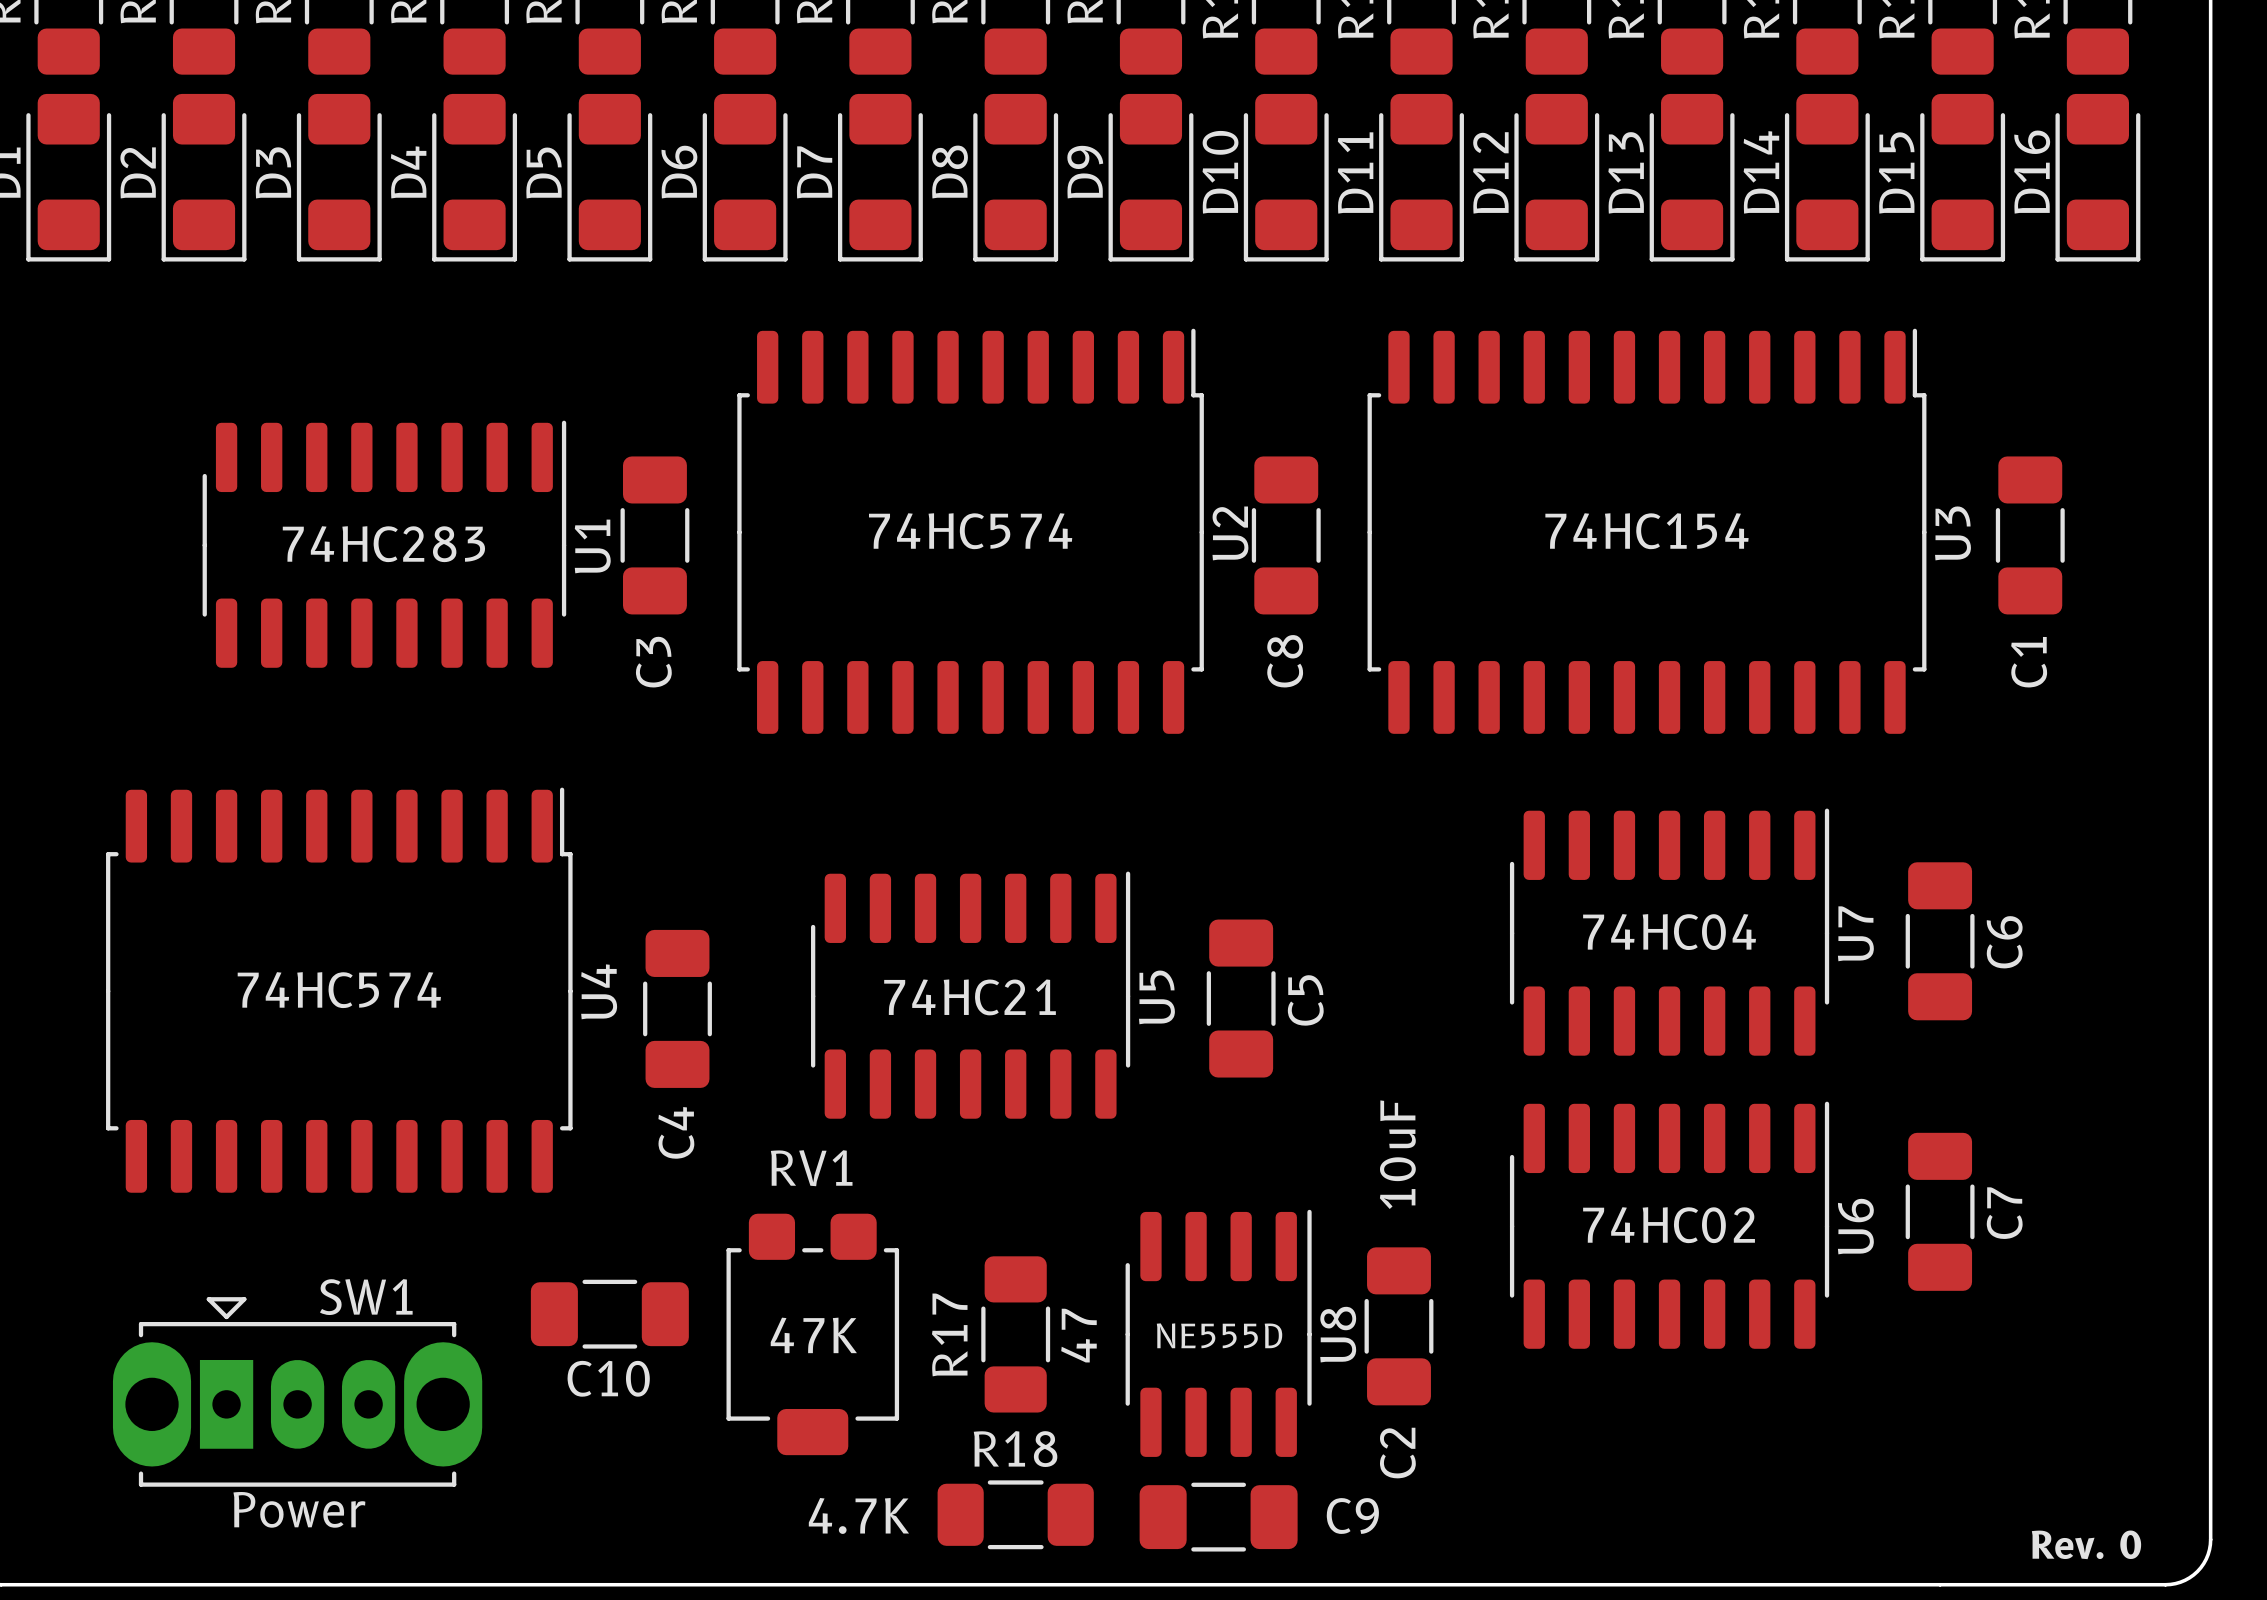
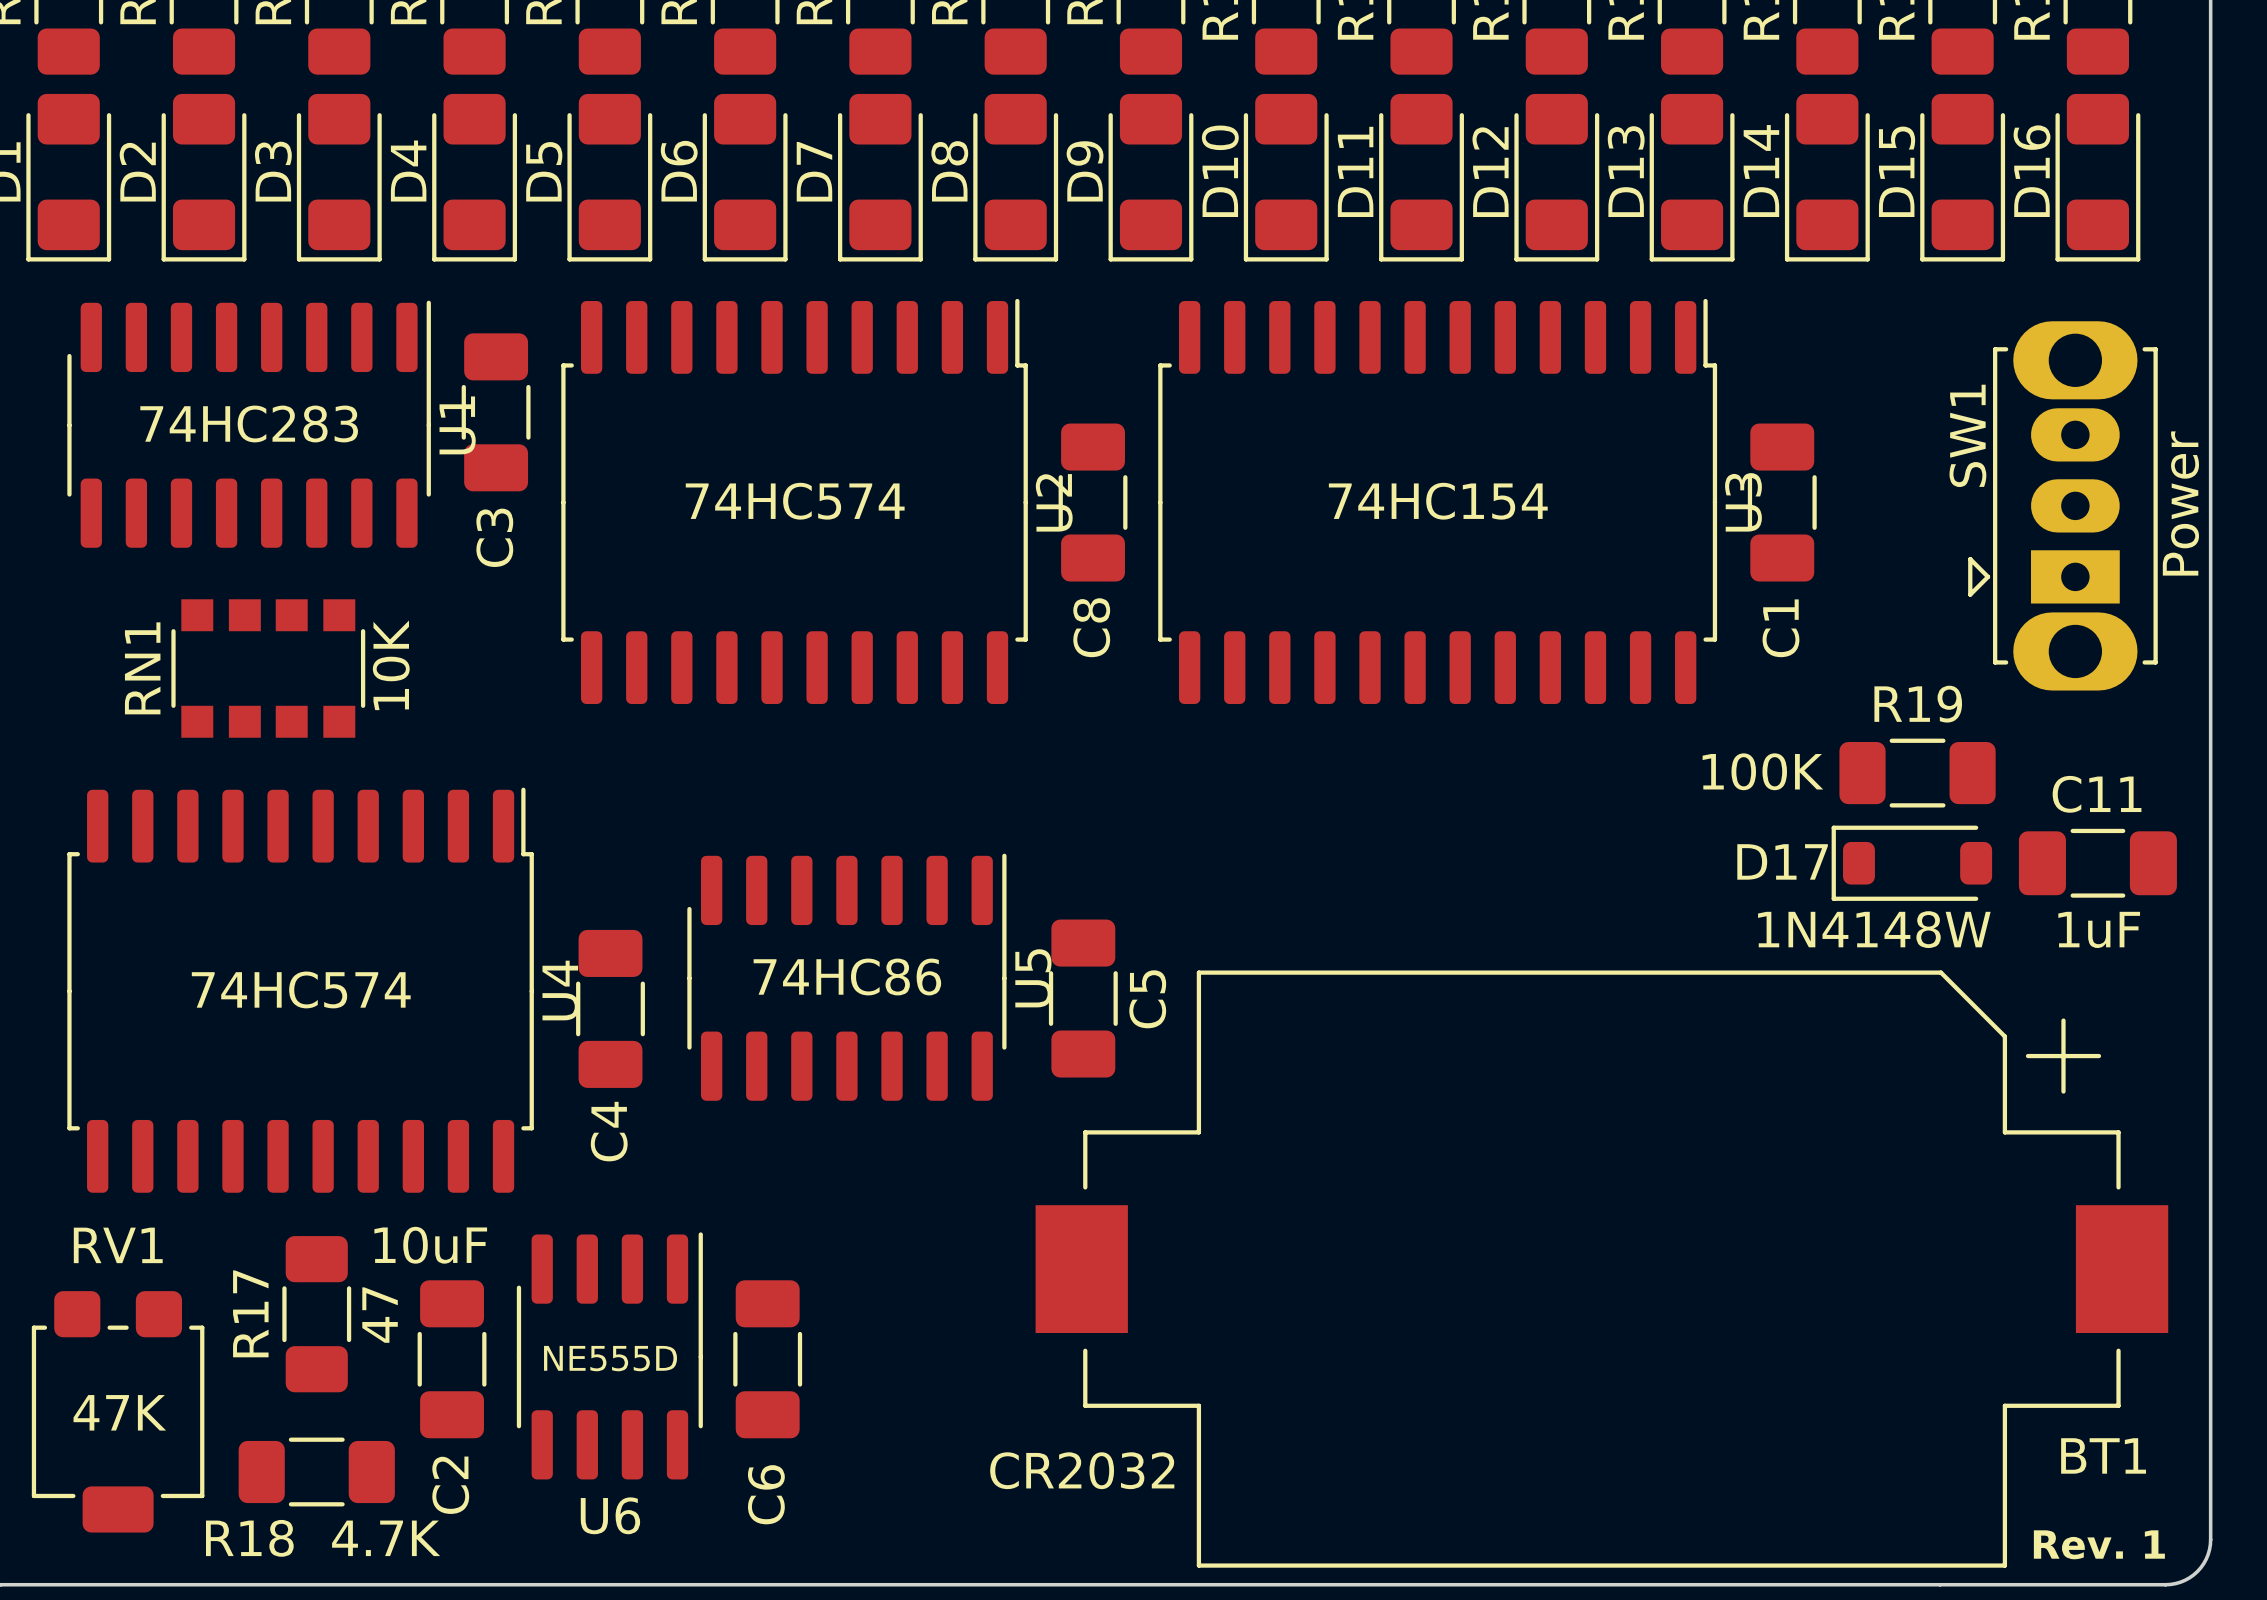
U2 position: (970, 531) -> (794, 501)
U3 position: (1647, 531) -> (1437, 501)
C3 position: (654, 535) -> (496, 412)
C8 position: (1286, 535) -> (1093, 502)
C1 position: (2030, 535) -> (1782, 502)
U1 position: (384, 544) -> (249, 424)
RN1: none -> 10K (268, 668)
R19: none -> 100K (1917, 773)
D17: none -> 1N4148W (1911, 863)
C11: none -> 1uF (2097, 863)
U7: 74HC04 (1669, 932) -> none
C6 position: (1940, 941) -> (767, 1359)
C6 name position: C6 (2004, 942) -> C6 (766, 1494)
U4 position: (339, 990) -> (300, 990)
U5 position: (970, 995) -> (846, 977)
U5 value: 74HC21 (970, 997) -> 74HC86 (847, 976)
C5 position: (1241, 998) -> (1083, 998)
C4 position: (677, 1008) -> (610, 1008)
U6 footprint: [1509, 1101, 1830, 1349] -> [516, 1232, 703, 1480]
C2 value rotation: 0° (1397, 1154) -> 90° clockwise (430, 1245)
C7: (1940, 1211) -> none
U6 value: 74HC02 (1669, 1225) -> NE555D (610, 1358)
U6 name position: U6 (1855, 1226) -> U6 (610, 1515)
BT1: none -> CR2032 (1601, 1269)
C10: (609, 1314) -> none
C2 position: (1398, 1326) -> (452, 1359)
U8: NE555D (1218, 1333) -> none
RV1 position: (812, 1334) -> (118, 1411)
R17 position: (1015, 1334) -> (316, 1314)
SW1 rotation: 0° (297, 1391) -> 90° counterclockwise (2062, 505)
SW1 position: (297, 1391) -> (2062, 505)
R18 name position: R18 (1015, 1449) -> R18 (249, 1538)
R18 position: (1015, 1514) -> (316, 1472)
R18 value position: 4.7K (858, 1515) -> 4.7K (386, 1538)
C9: (1218, 1517) -> none
text: Rev. 0 (2086, 1544) -> Rev. 1 (2099, 1544)

